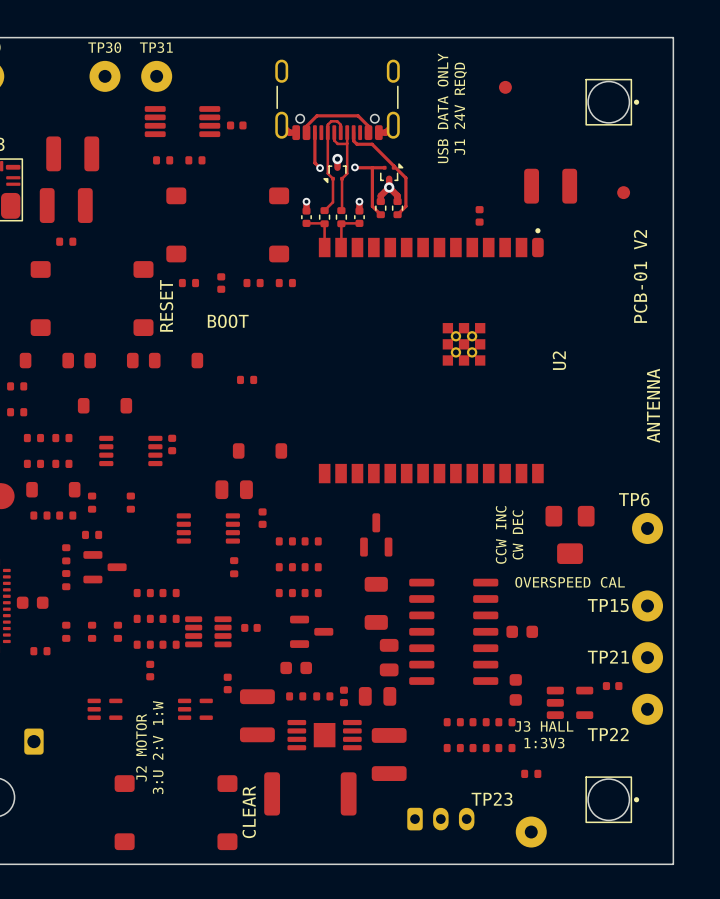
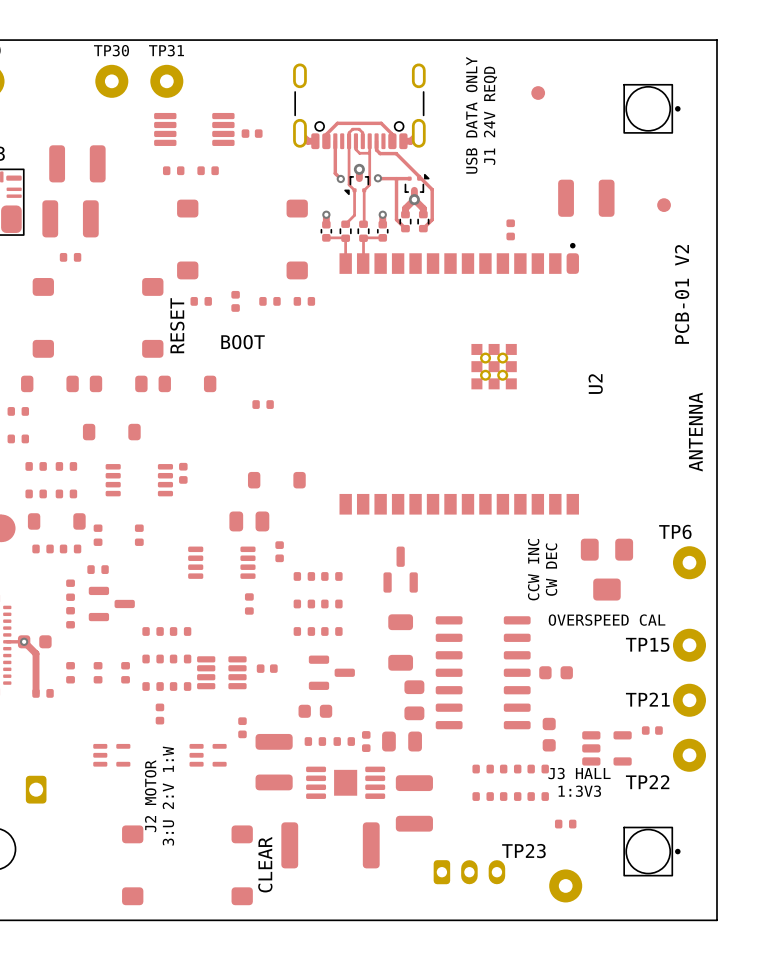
track: none -> (7, 641) (24, 641) (36, 653) (36, 693)
via: none -> (24, 641)

